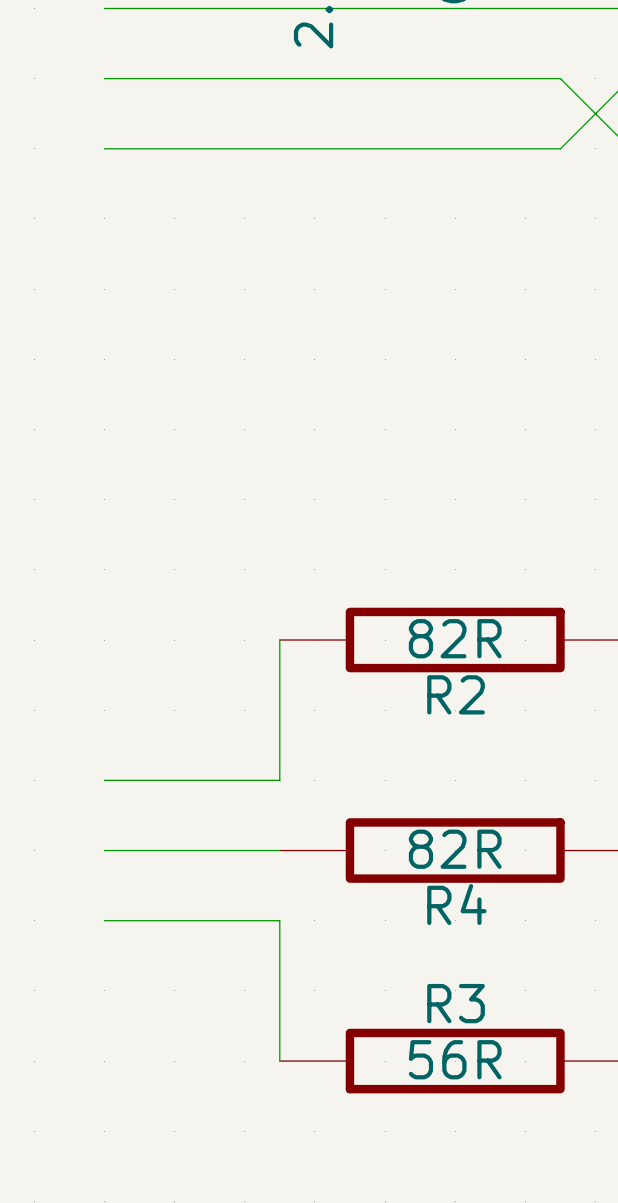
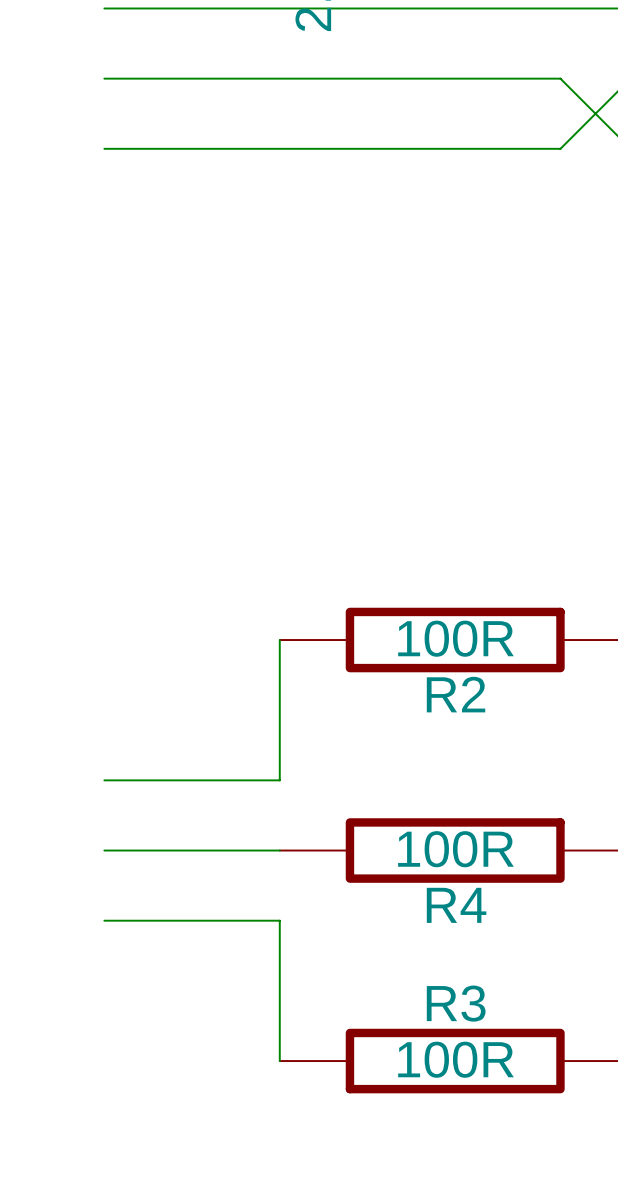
R2 value: 82R (455, 638) -> 100R (455, 638)
R4 value: 82R (455, 849) -> 100R (455, 849)
R3 value: 56R (455, 1059) -> 100R (455, 1059)

